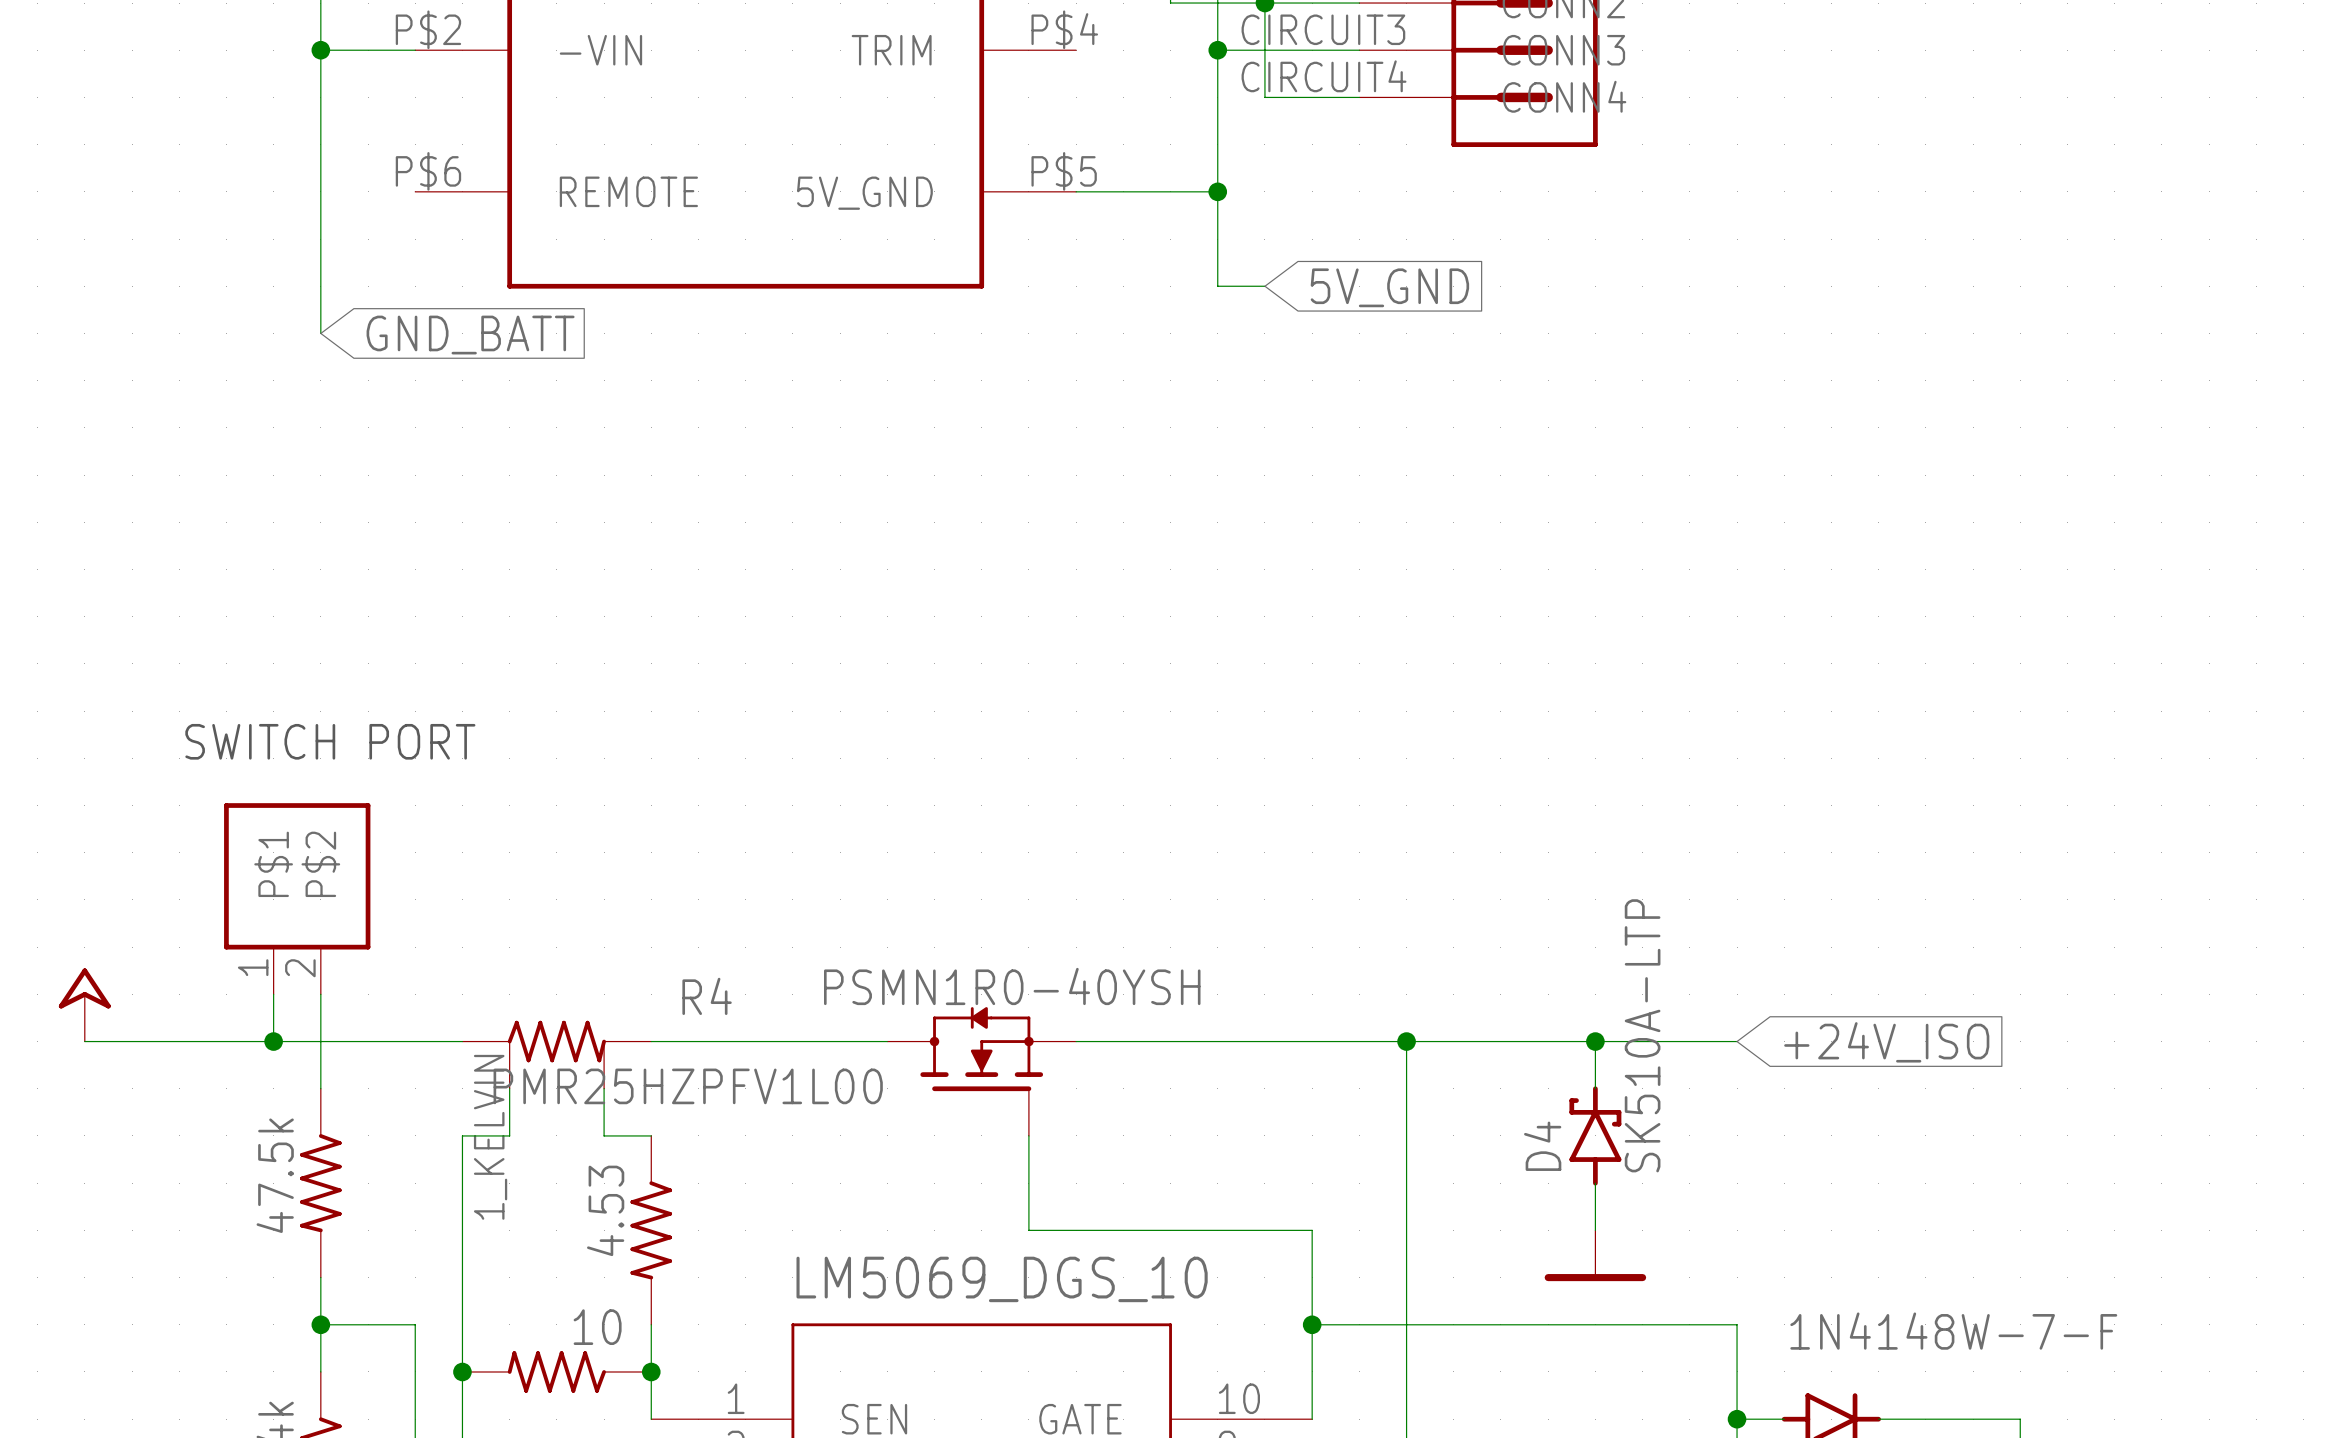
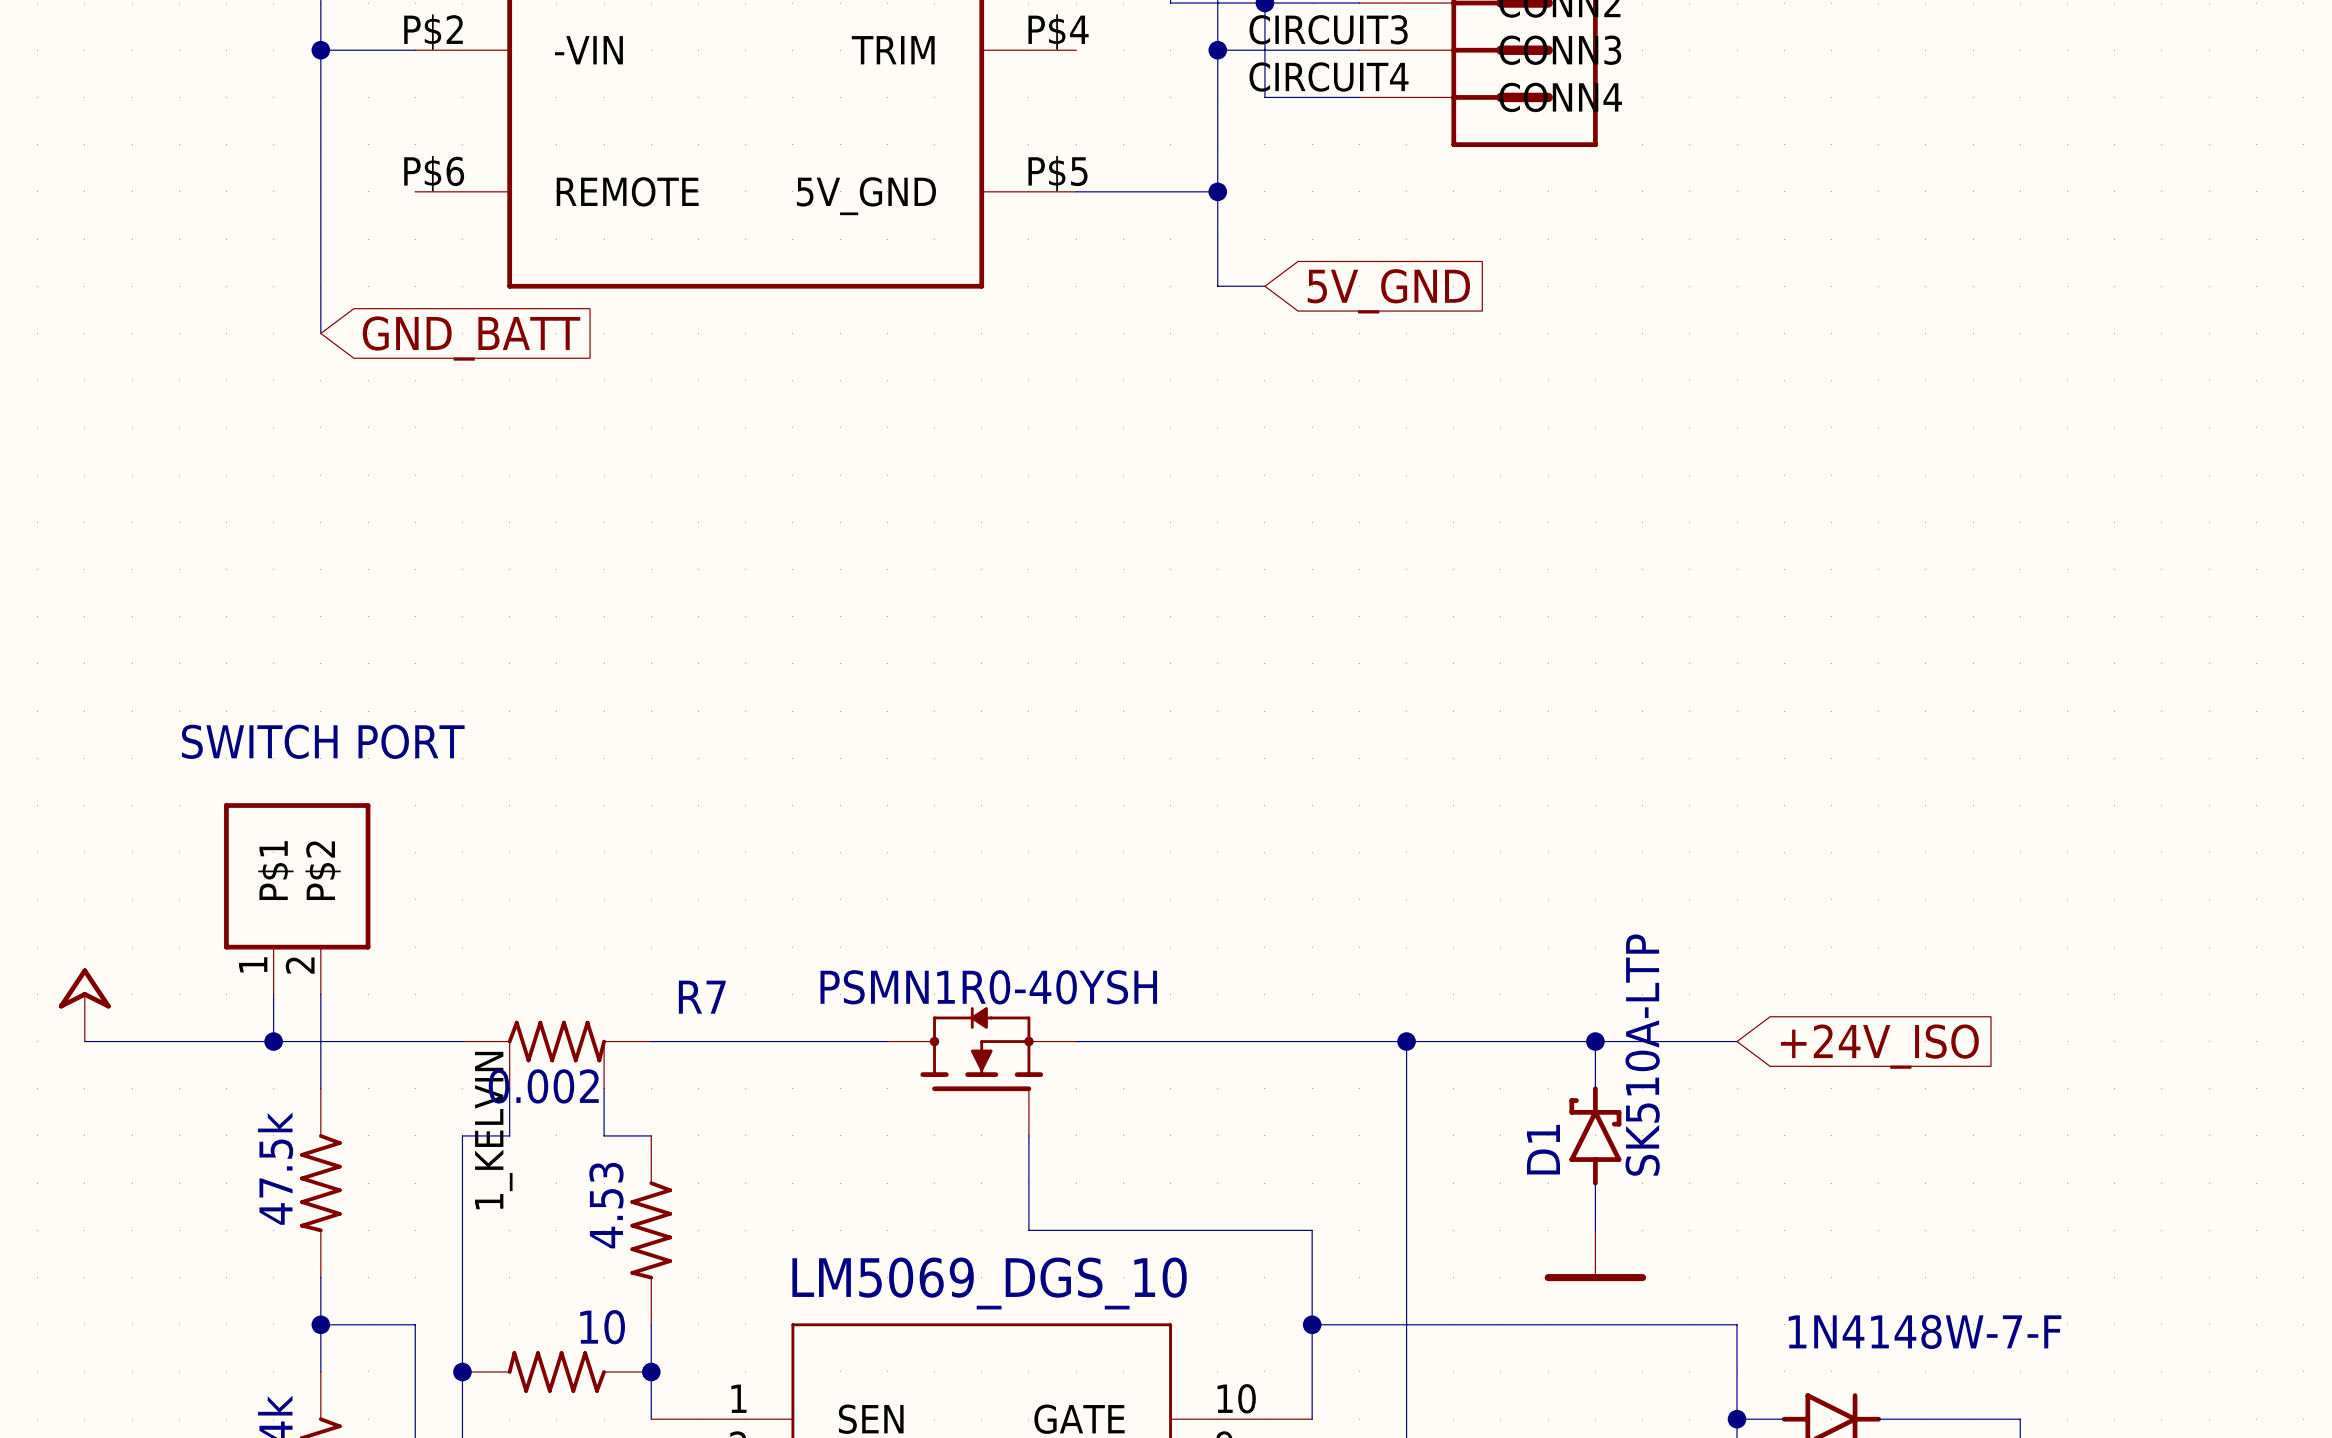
R4 name: R4 (707, 996) -> R7 (702, 997)
R4 value: PMR25HZPFV1L00 (688, 1086) -> 0.002 (543, 1086)
D4 name: D4 (1542, 1146) -> D1 (1543, 1149)

